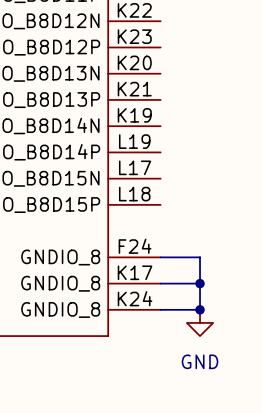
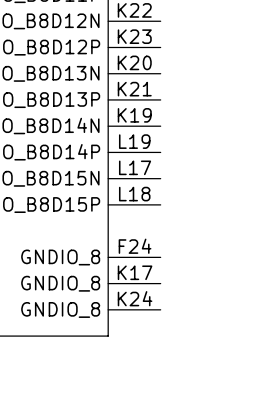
wire: (160, 257) (200, 257) (200, 309) (160, 309) -> none
wire: (160, 283) (200, 283) -> none
junction: (200, 283) -> none
junction: (200, 309) -> none
power symbol: GND (200, 322) -> none

